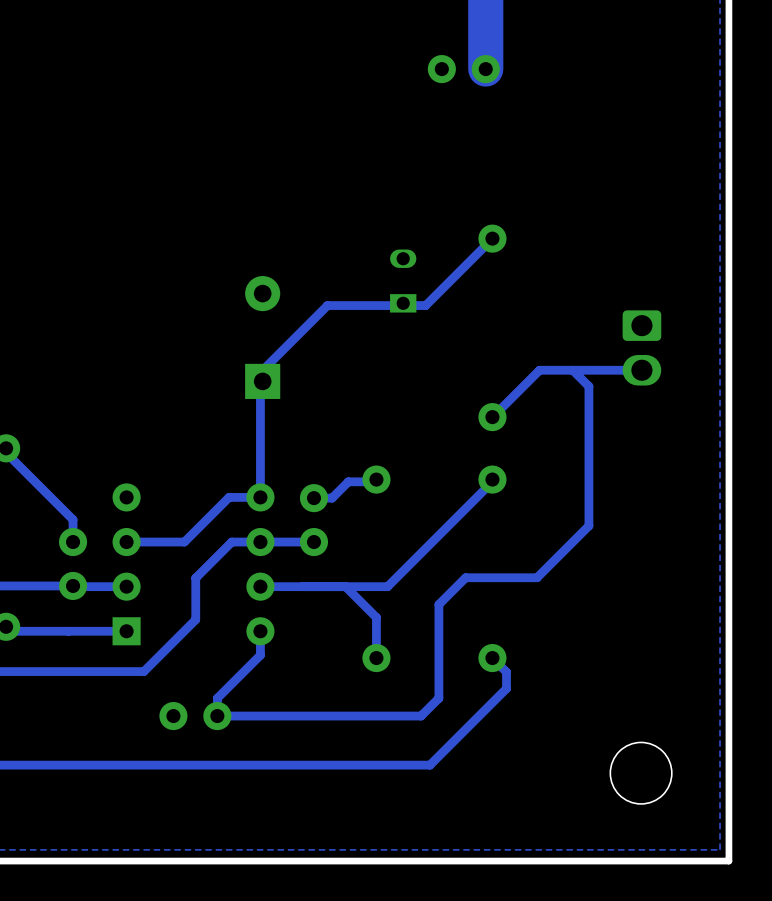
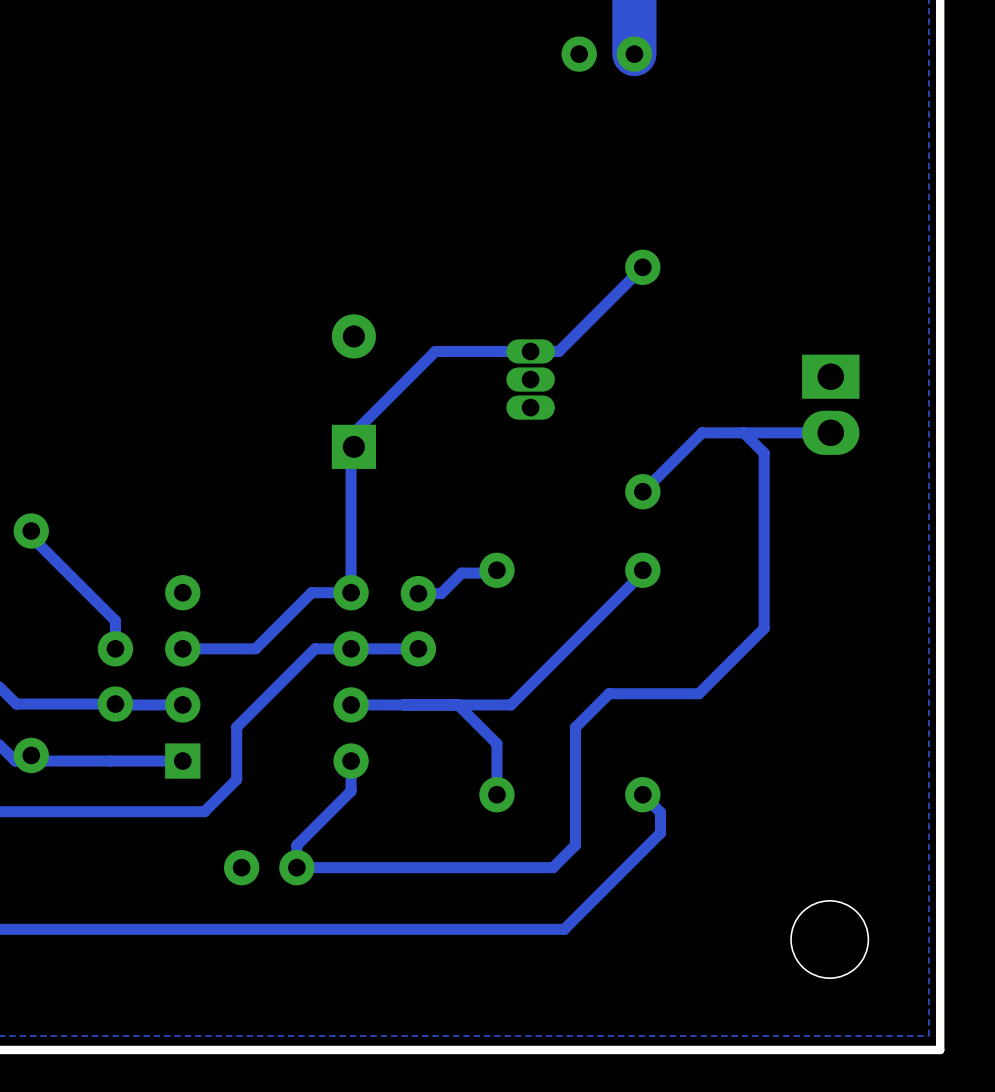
part: (403, 281) -> none
part footprint: [622, 310, 662, 386] -> [802, 354, 860, 455]
part: none -> (530, 379)
bottom track: (195, 578) (195, 619) (169, 645) -> (269, 694) (236, 727) (236, 779)

